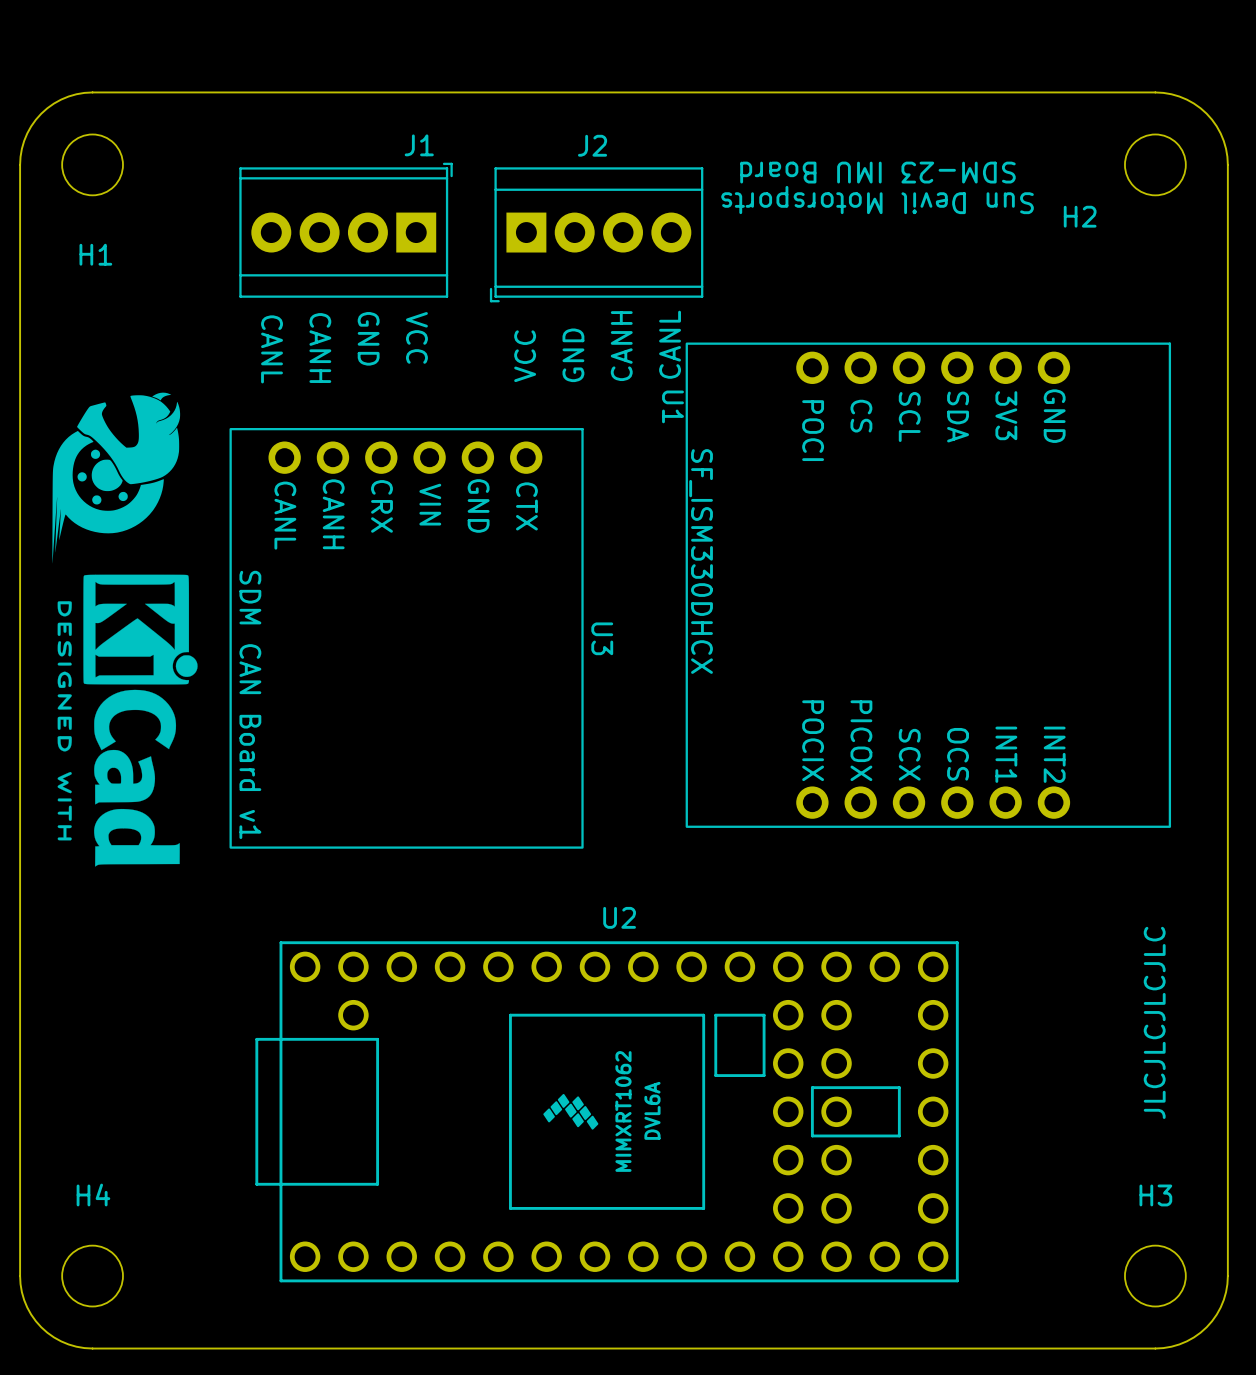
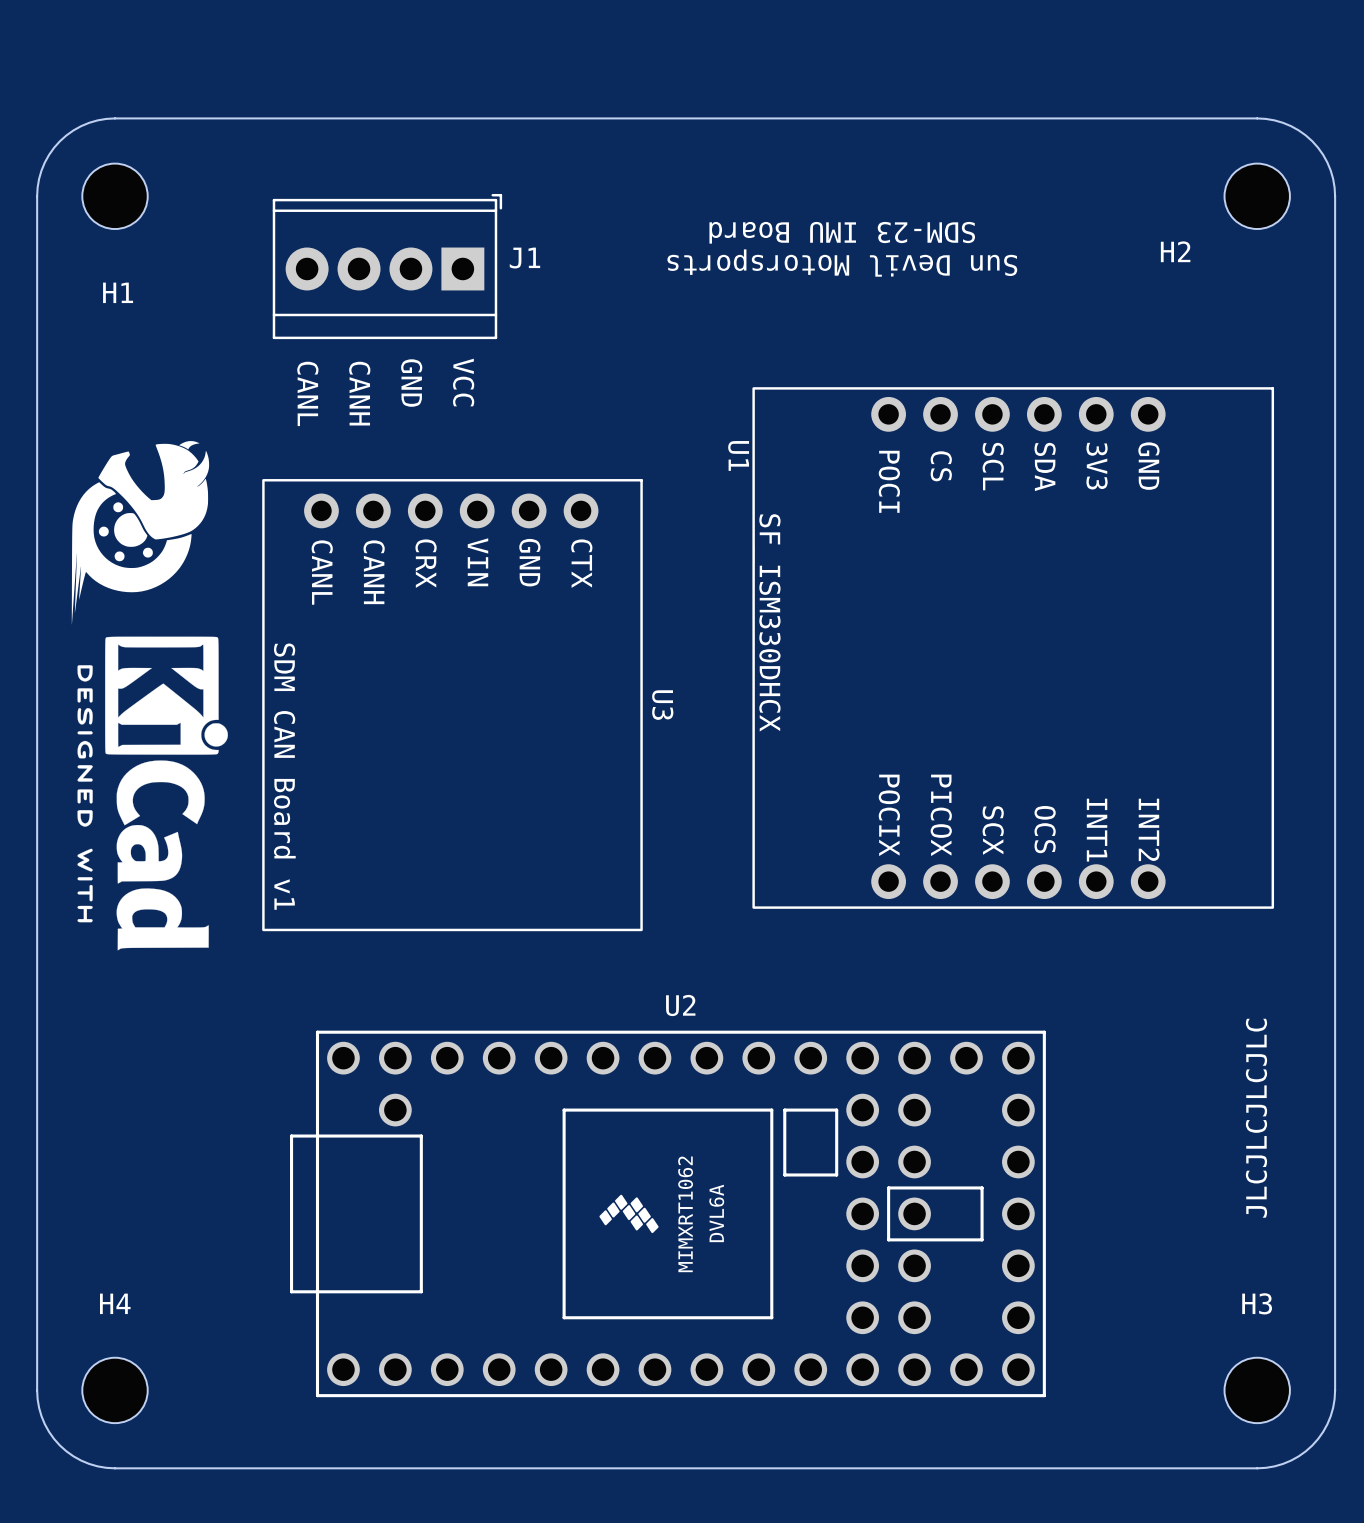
J1 name position: J1 (419, 145) -> J1 (524, 258)
text position: SDM-23 IMU Board (877, 172) -> SDM-23 IMU Board (842, 232)
text position: Sun Devil Motorsports (877, 200) -> Sun Devil Motorsports (842, 263)
J2: (596, 234) -> none
text: CANL (670, 344) -> none
text: CANH (621, 346) -> none
text: GND (573, 355) -> none
text: VCC (525, 356) -> none

